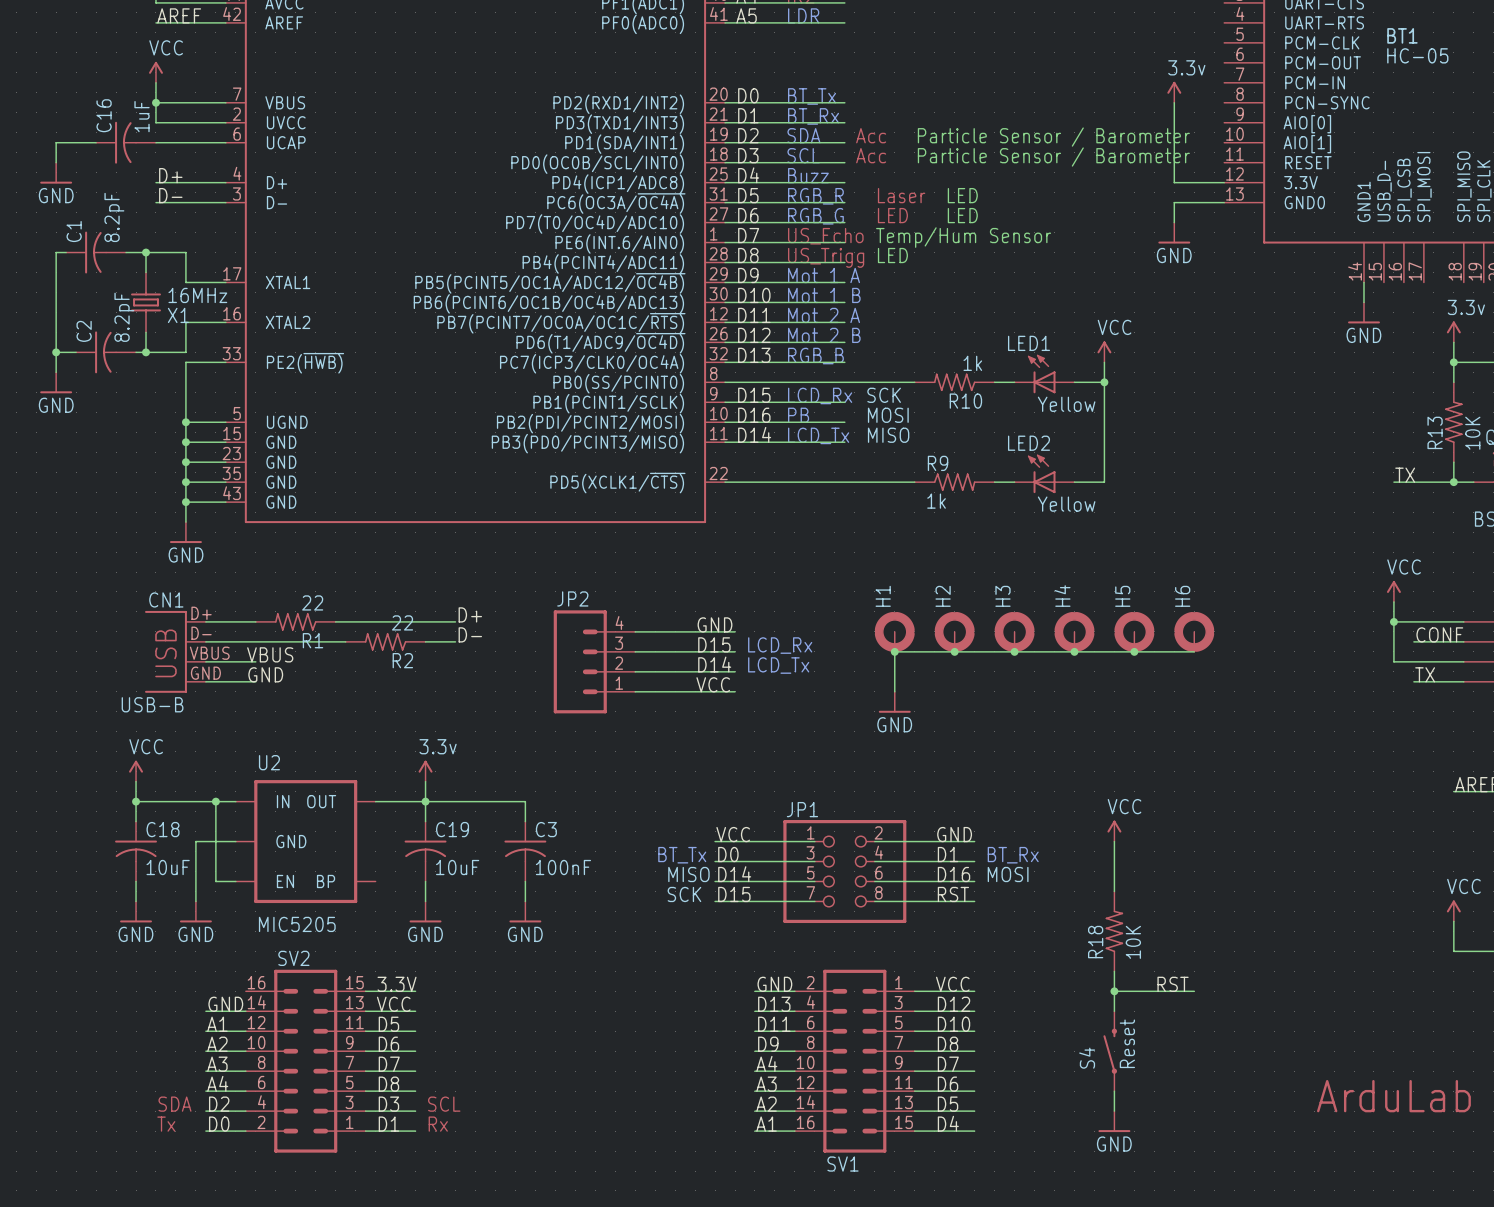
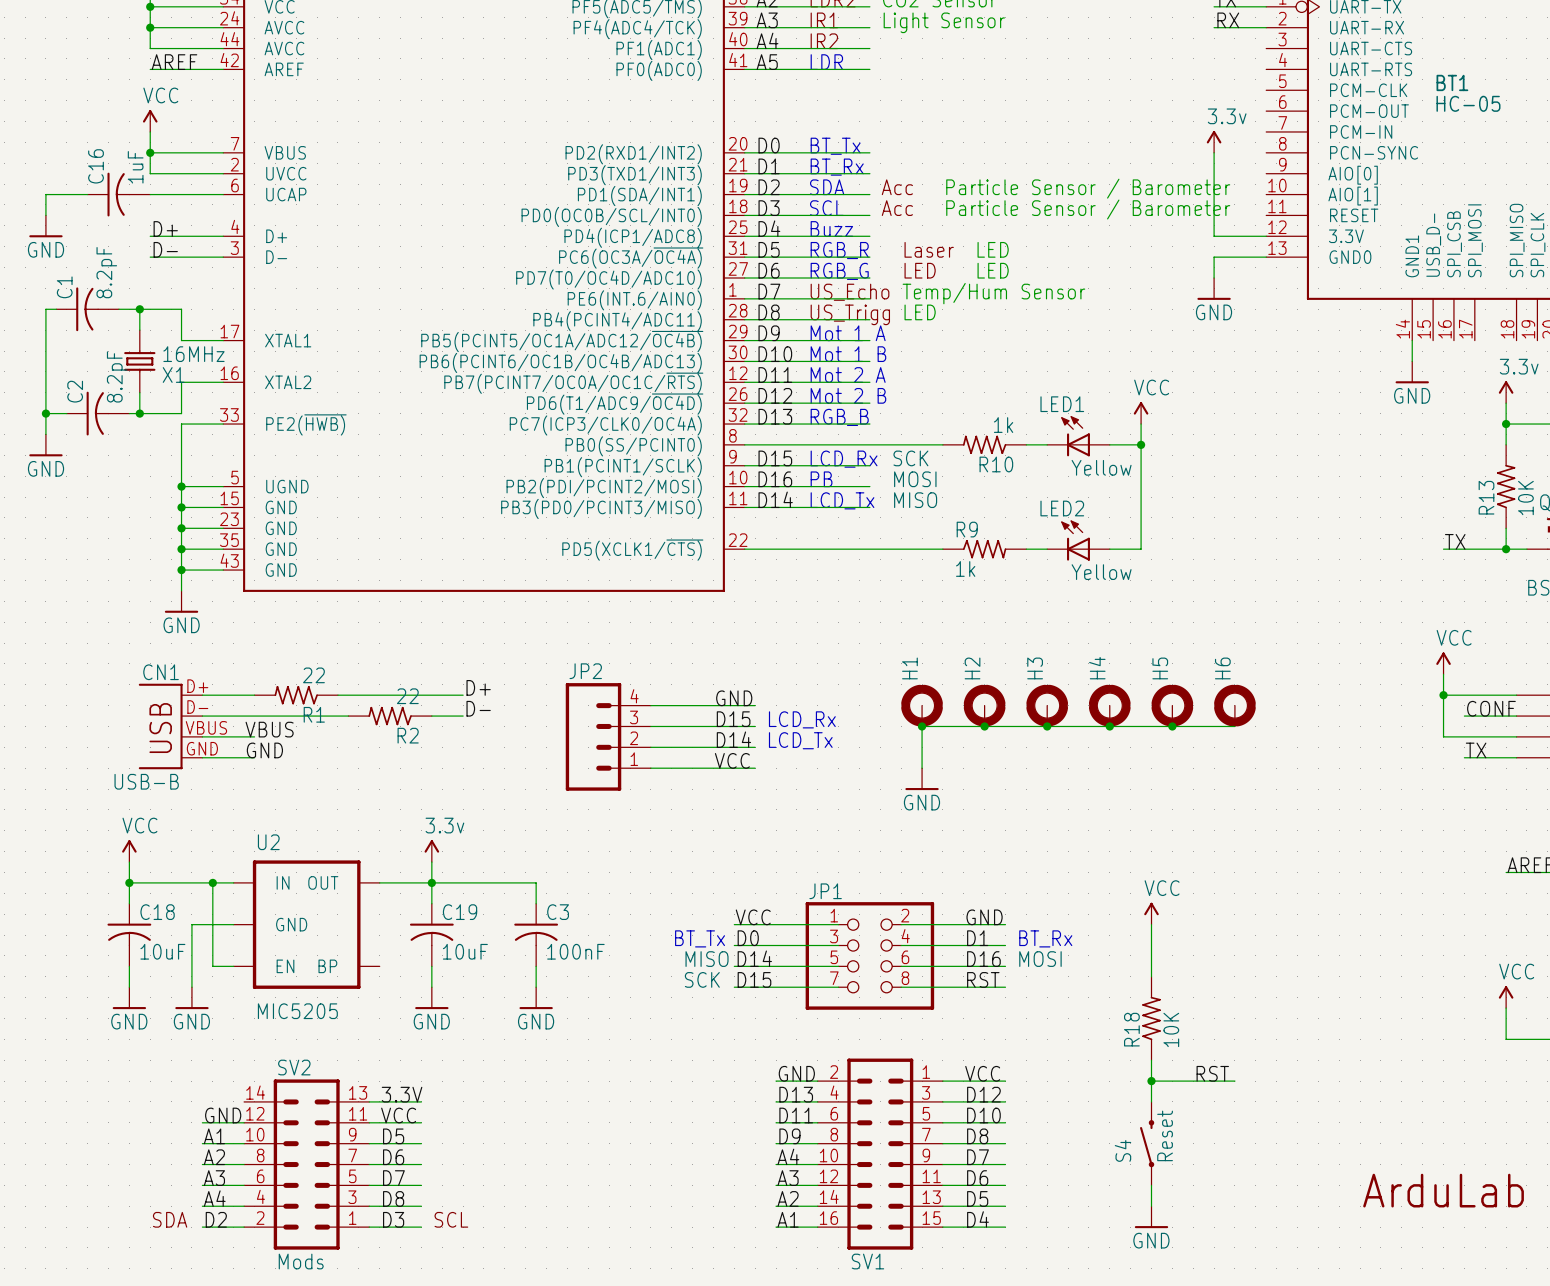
SV2 symbol: [245, 969, 366, 1153] -> [244, 1079, 370, 1250]
label: 3.3V (397, 984) -> none
wire: (365, 991) (415, 991) -> none
label: GND (225, 1004) -> none
label: VCC (393, 1004) -> 3.3V (402, 1094)
wire: (205, 1011) (245, 1011) -> none
label: A1 (217, 1024) -> GND (223, 1115)
label: D5 (388, 1024) -> VCC (398, 1115)
label: A2 (217, 1044) -> A1 (214, 1136)
label: D6 (388, 1044) -> D5 (393, 1136)
label: A3 (217, 1064) -> A2 (214, 1157)
label: D7 (389, 1064) -> D6 (393, 1157)
label: A4 (217, 1083) -> A3 (214, 1178)
label: D8 (388, 1084) -> D7 (393, 1178)
text: SDA (174, 1104) -> none
label: D2 (219, 1104) -> A4 (214, 1198)
label: D3 (388, 1104) -> D8 (393, 1198)
text: SCL (444, 1104) -> none
text: Tx (166, 1124) -> SDA (170, 1219)
label: D0 (219, 1124) -> D2 (216, 1219)
label: D1 (388, 1124) -> D3 (393, 1219)
text: Rx (438, 1124) -> SCL (451, 1219)
SV2 value: none -> Mods (301, 1261)

